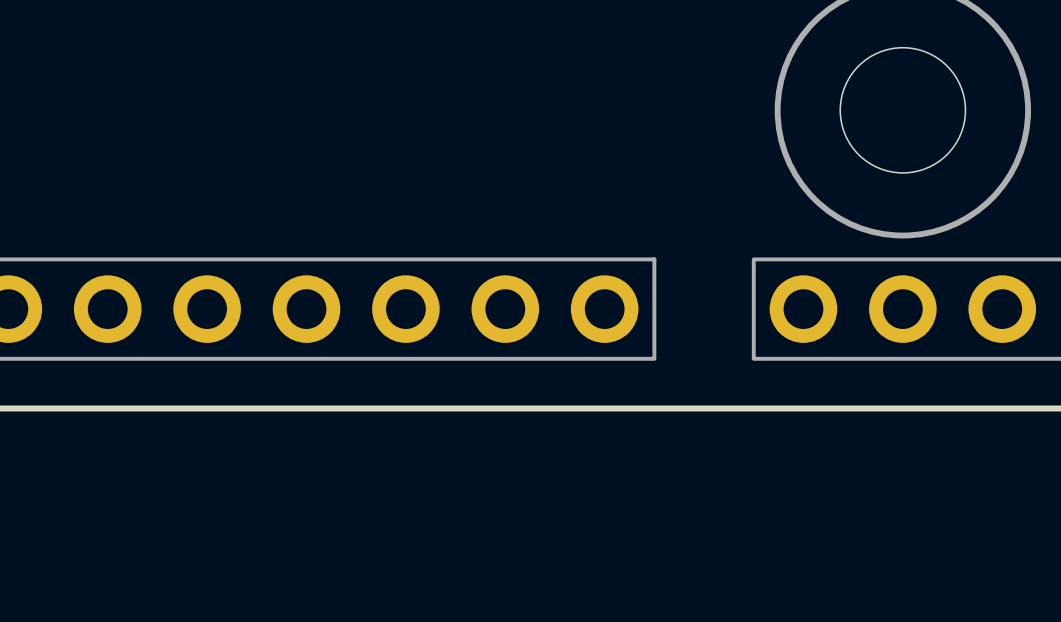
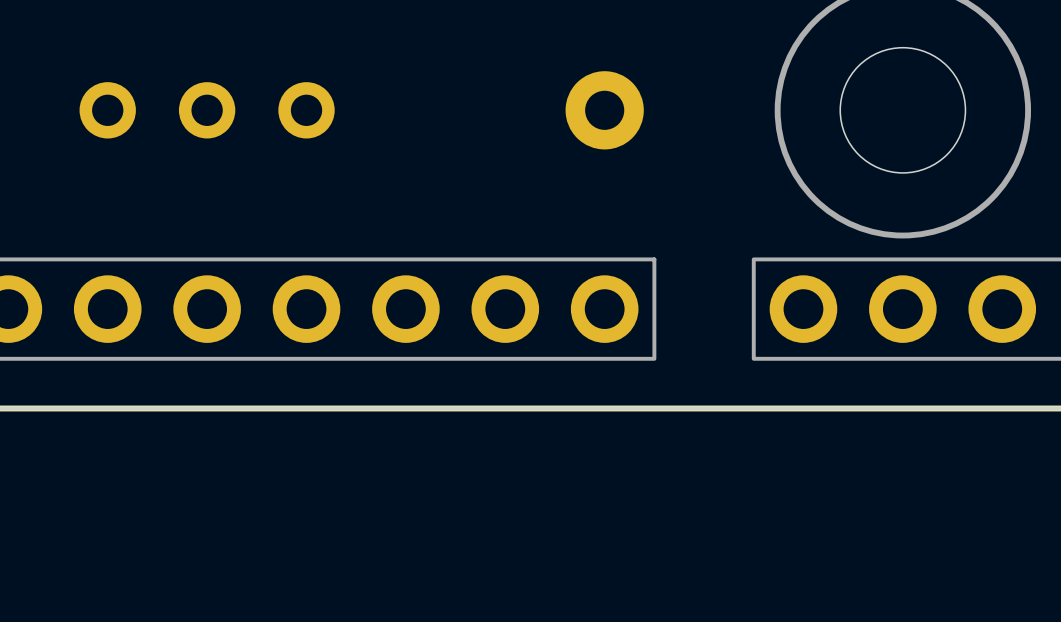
part: none -> (207, 110)
part: none -> (604, 110)

